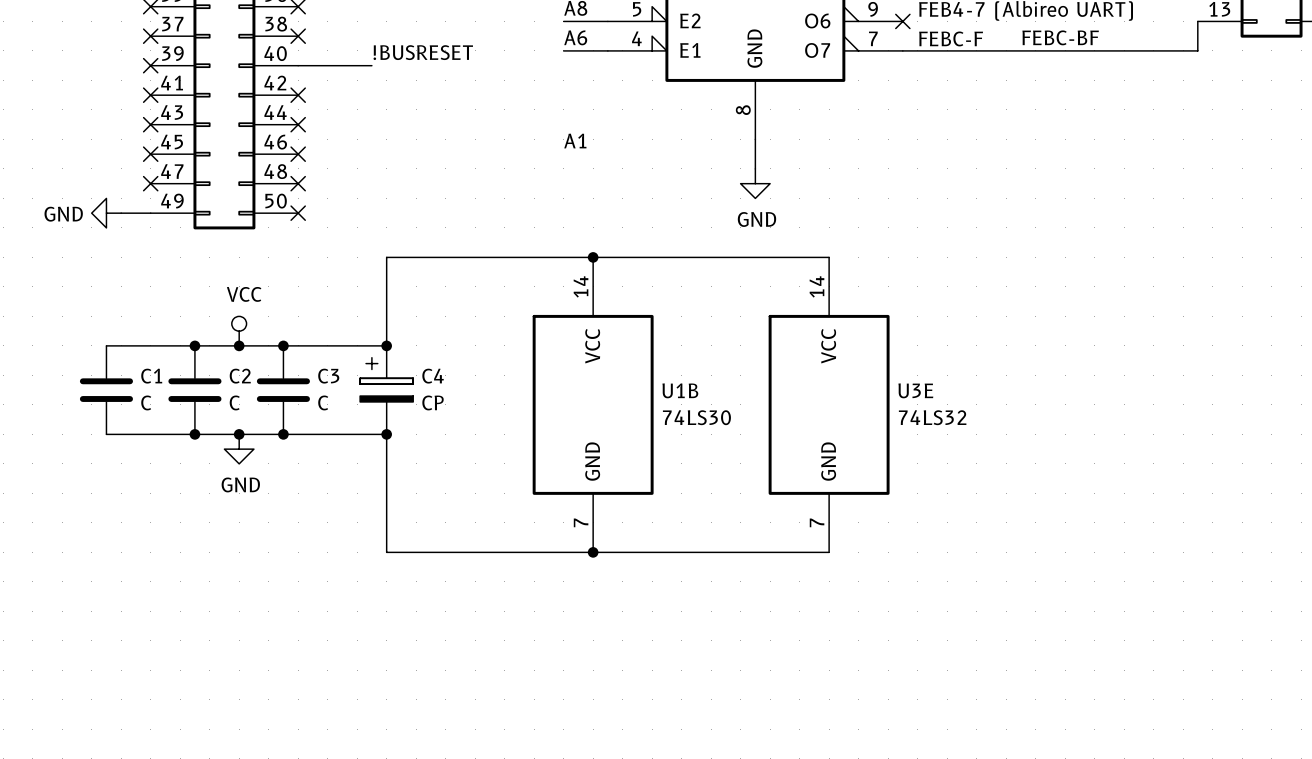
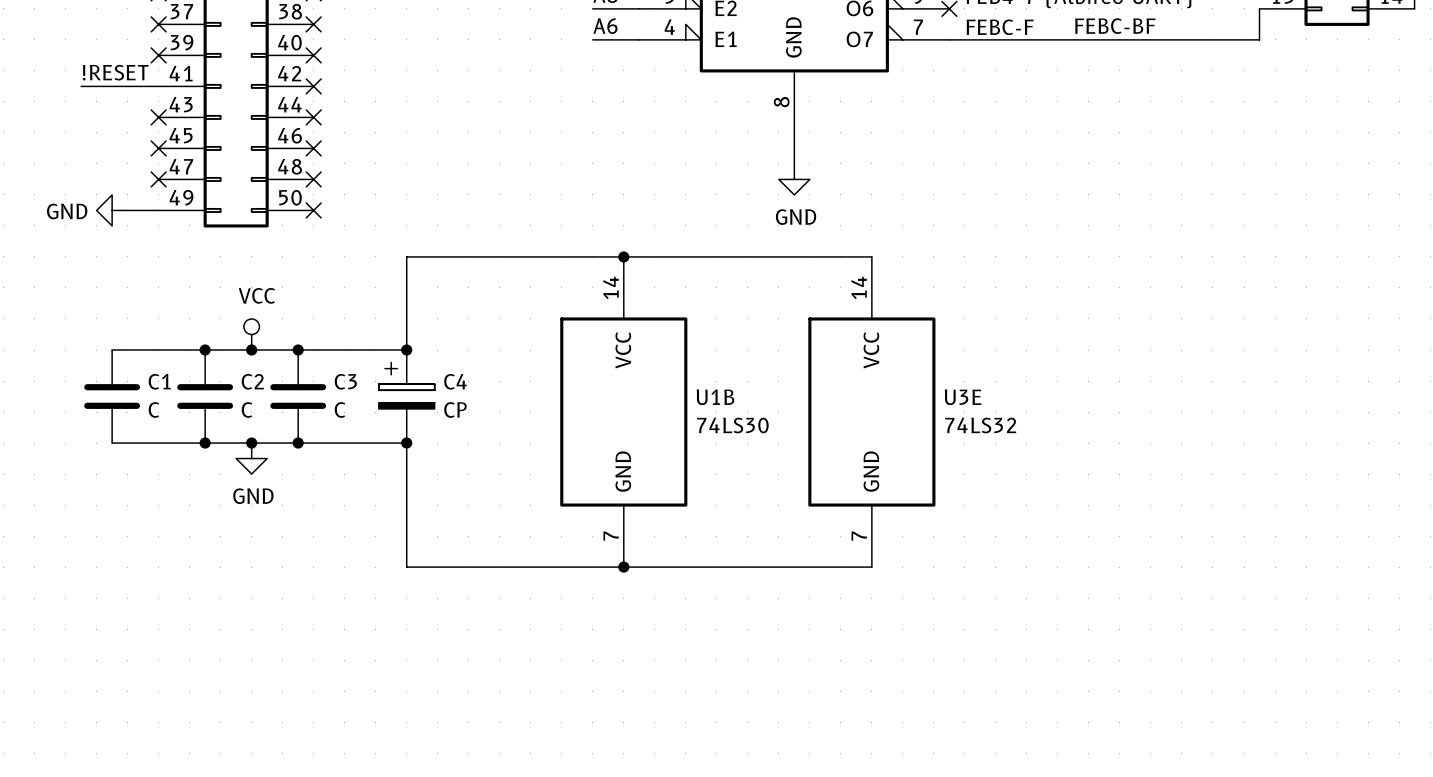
label: !BUSRESET (423, 52) -> none
wire: (298, 65) (371, 65) -> (81, 86) (158, 86)
no-connect mark: none -> (313, 55)
label: none -> !RESET (115, 72)
no-connect mark: (150, 95) -> none
label: A1 (575, 141) -> none

